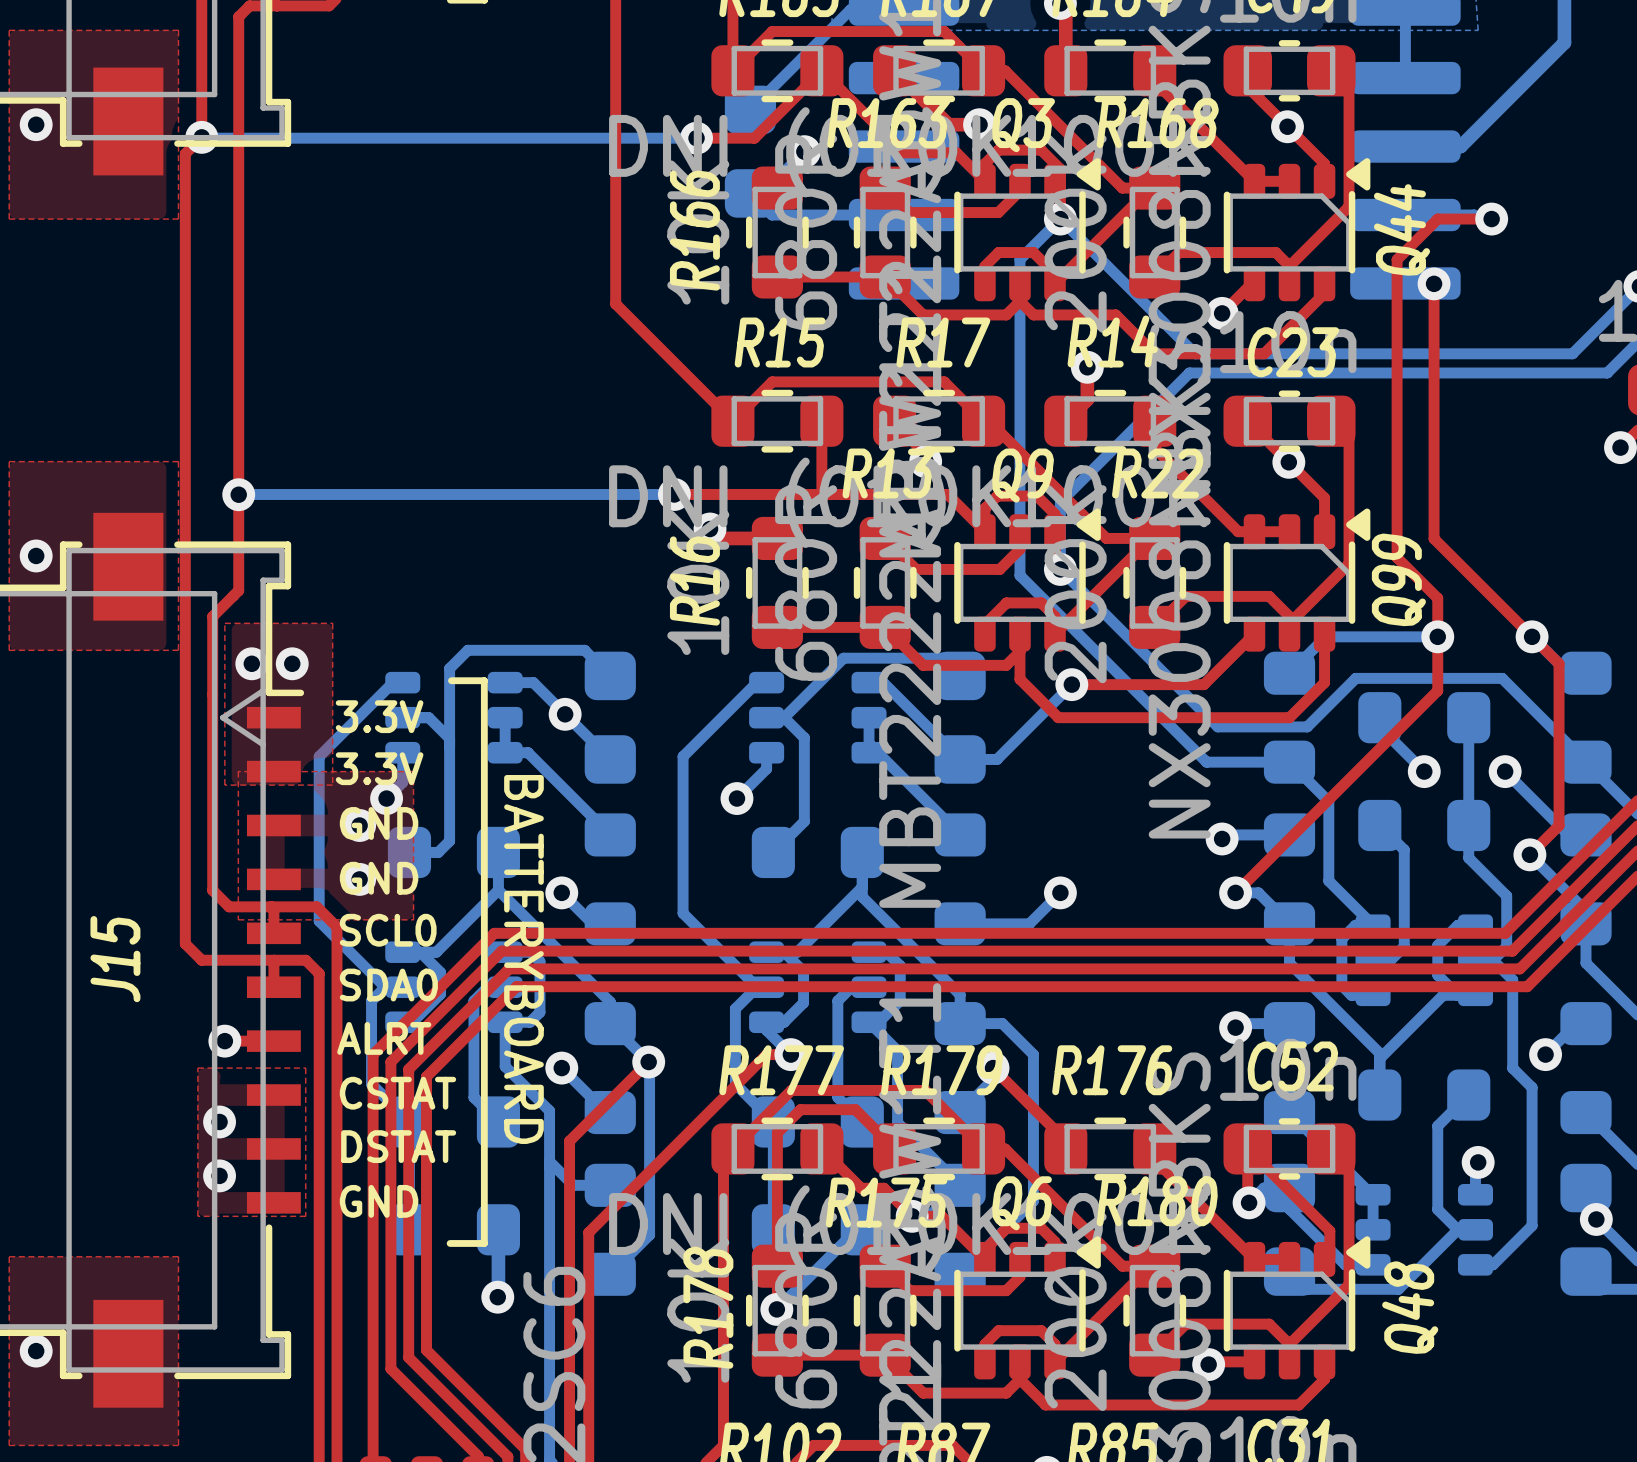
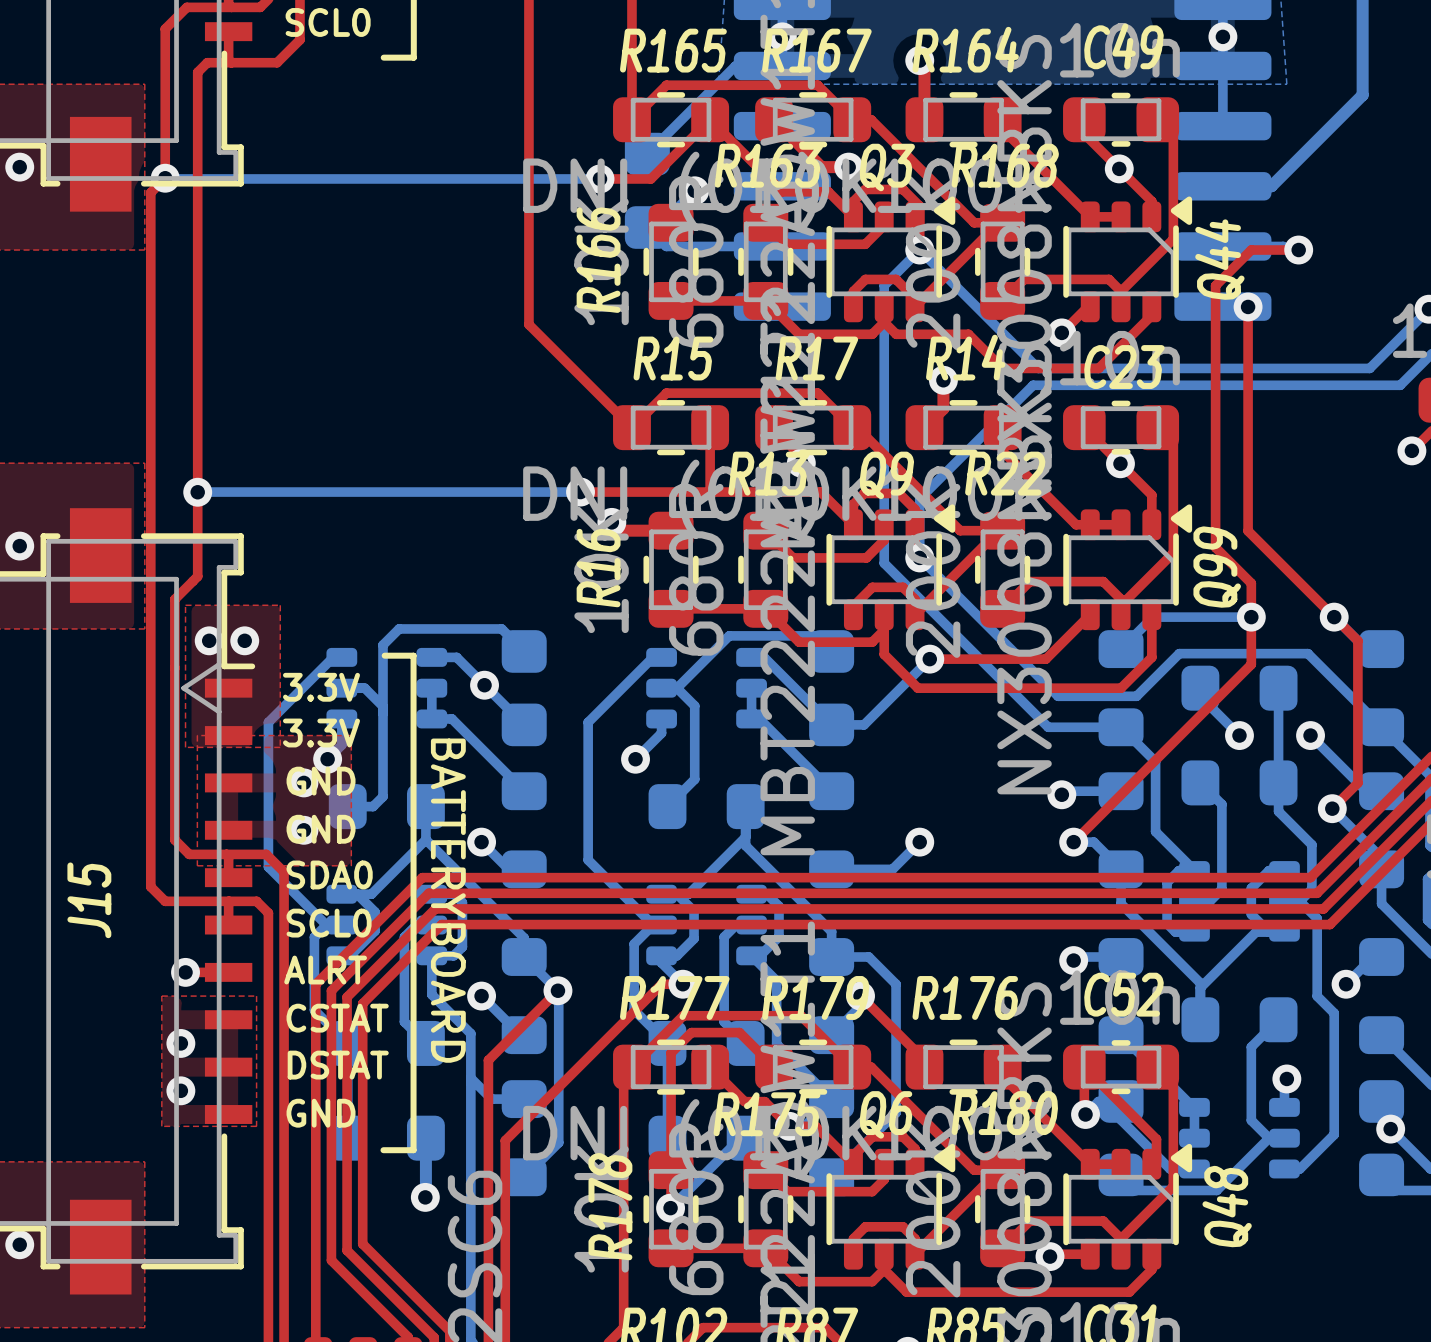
text: SCL0 (388, 930) -> SDA0 (329, 874)
text: SDA0 (388, 985) -> SCL0 (329, 923)

